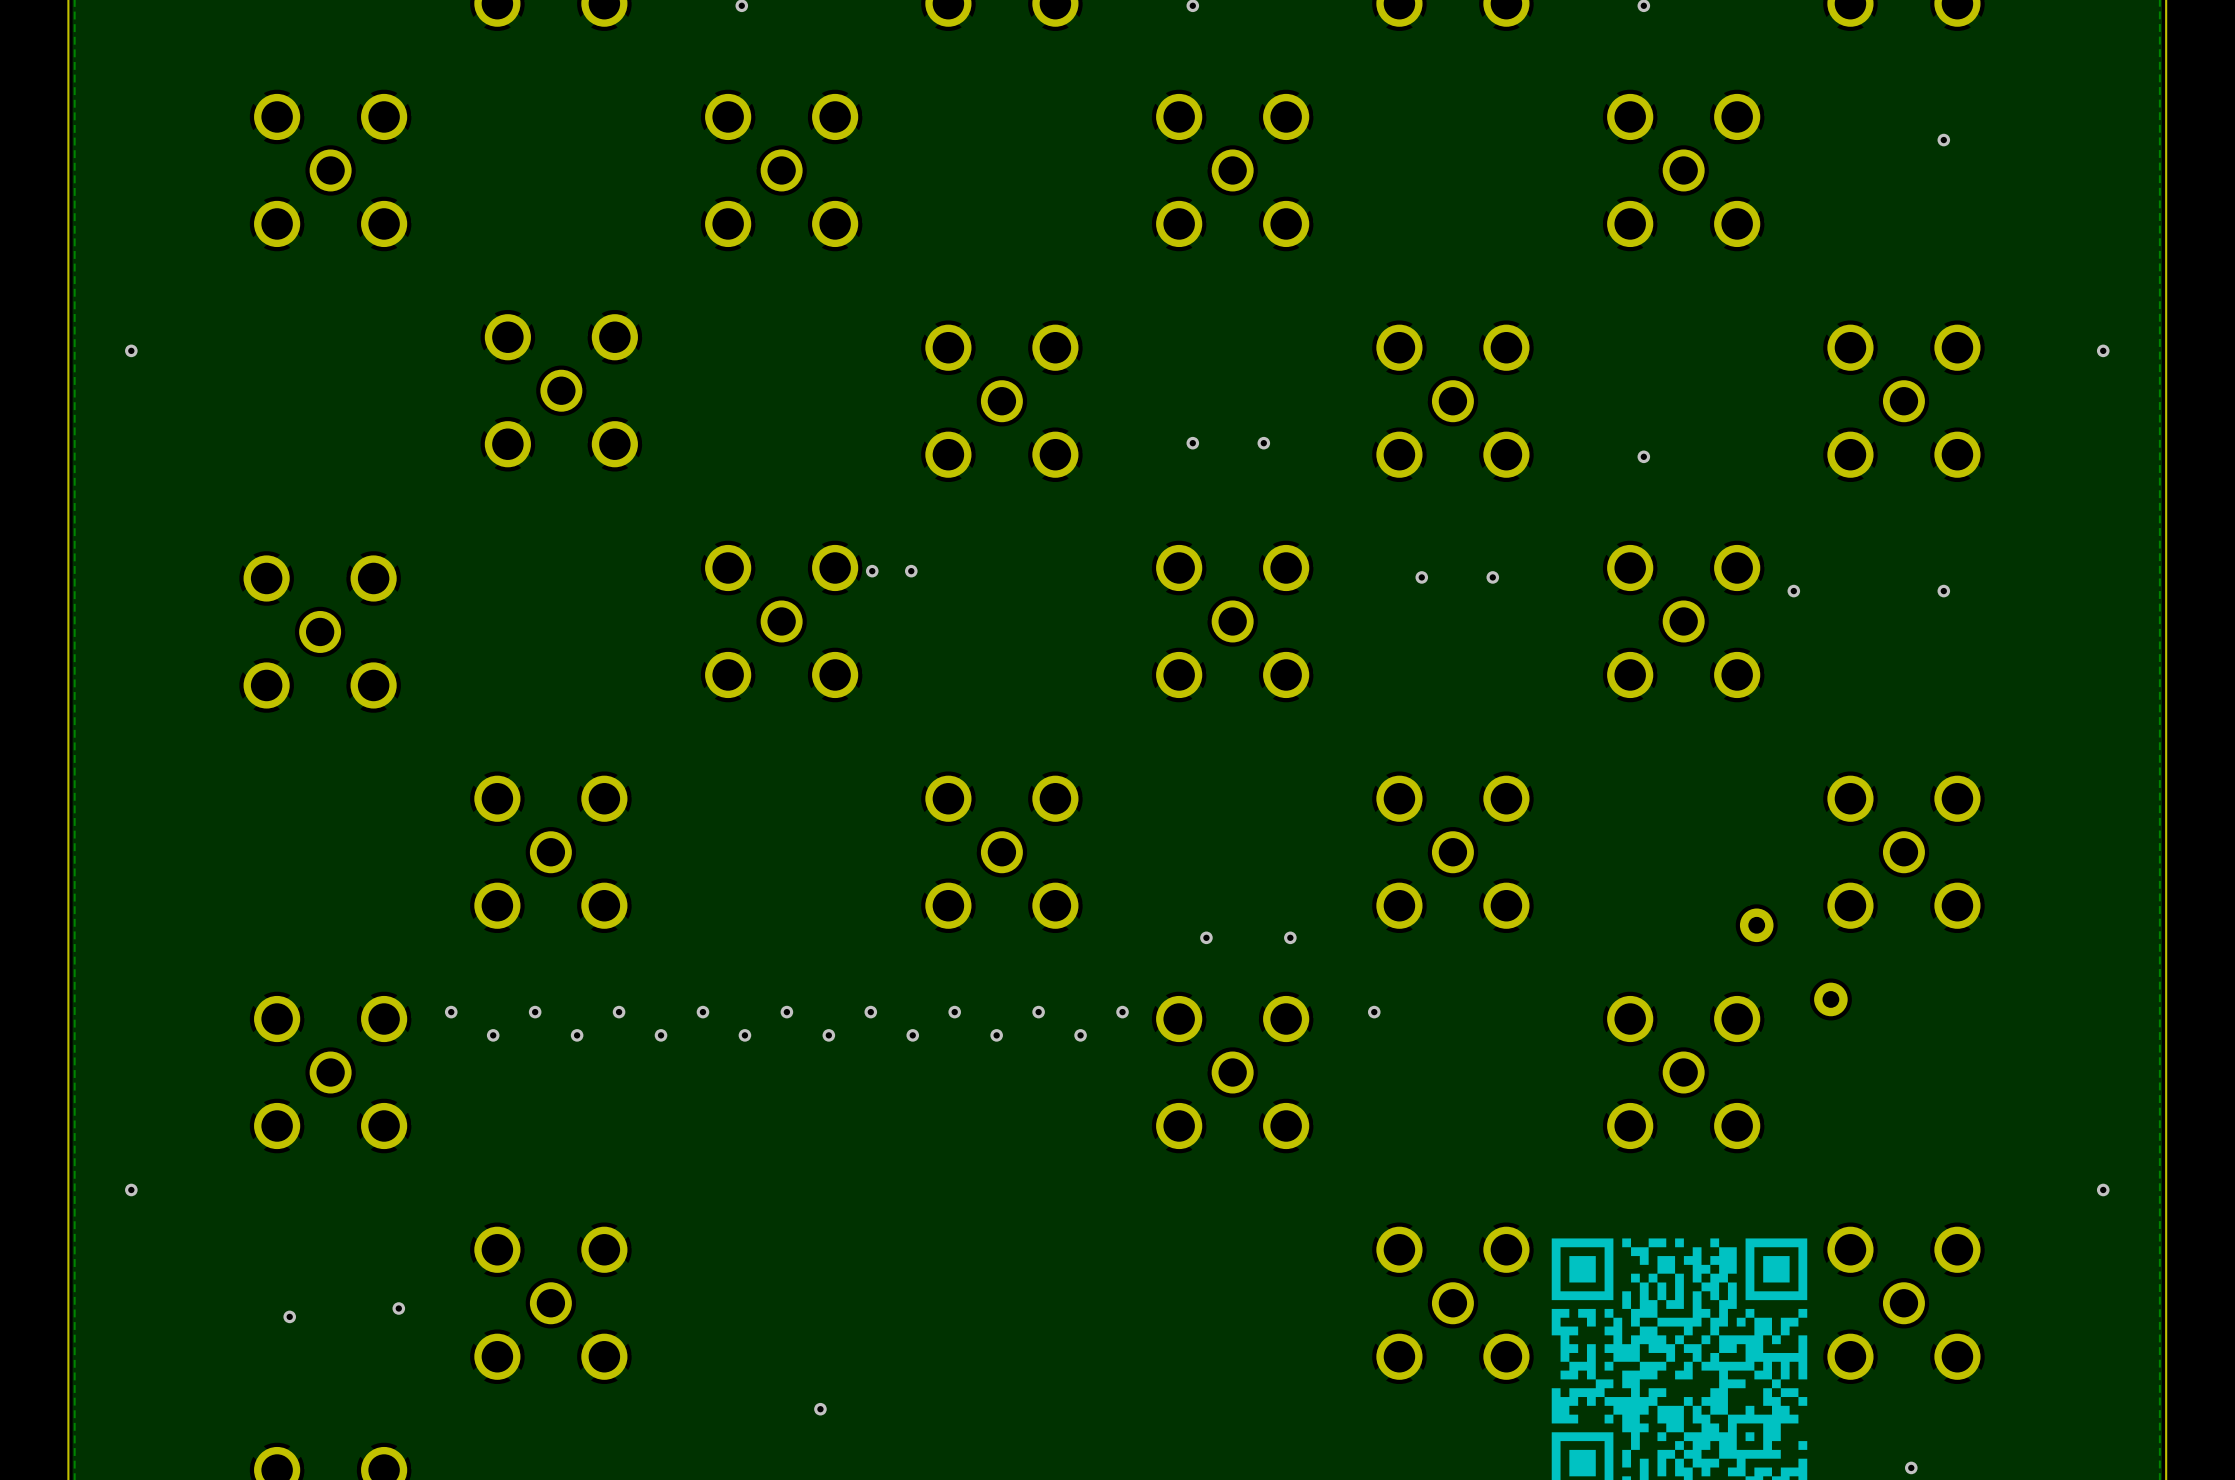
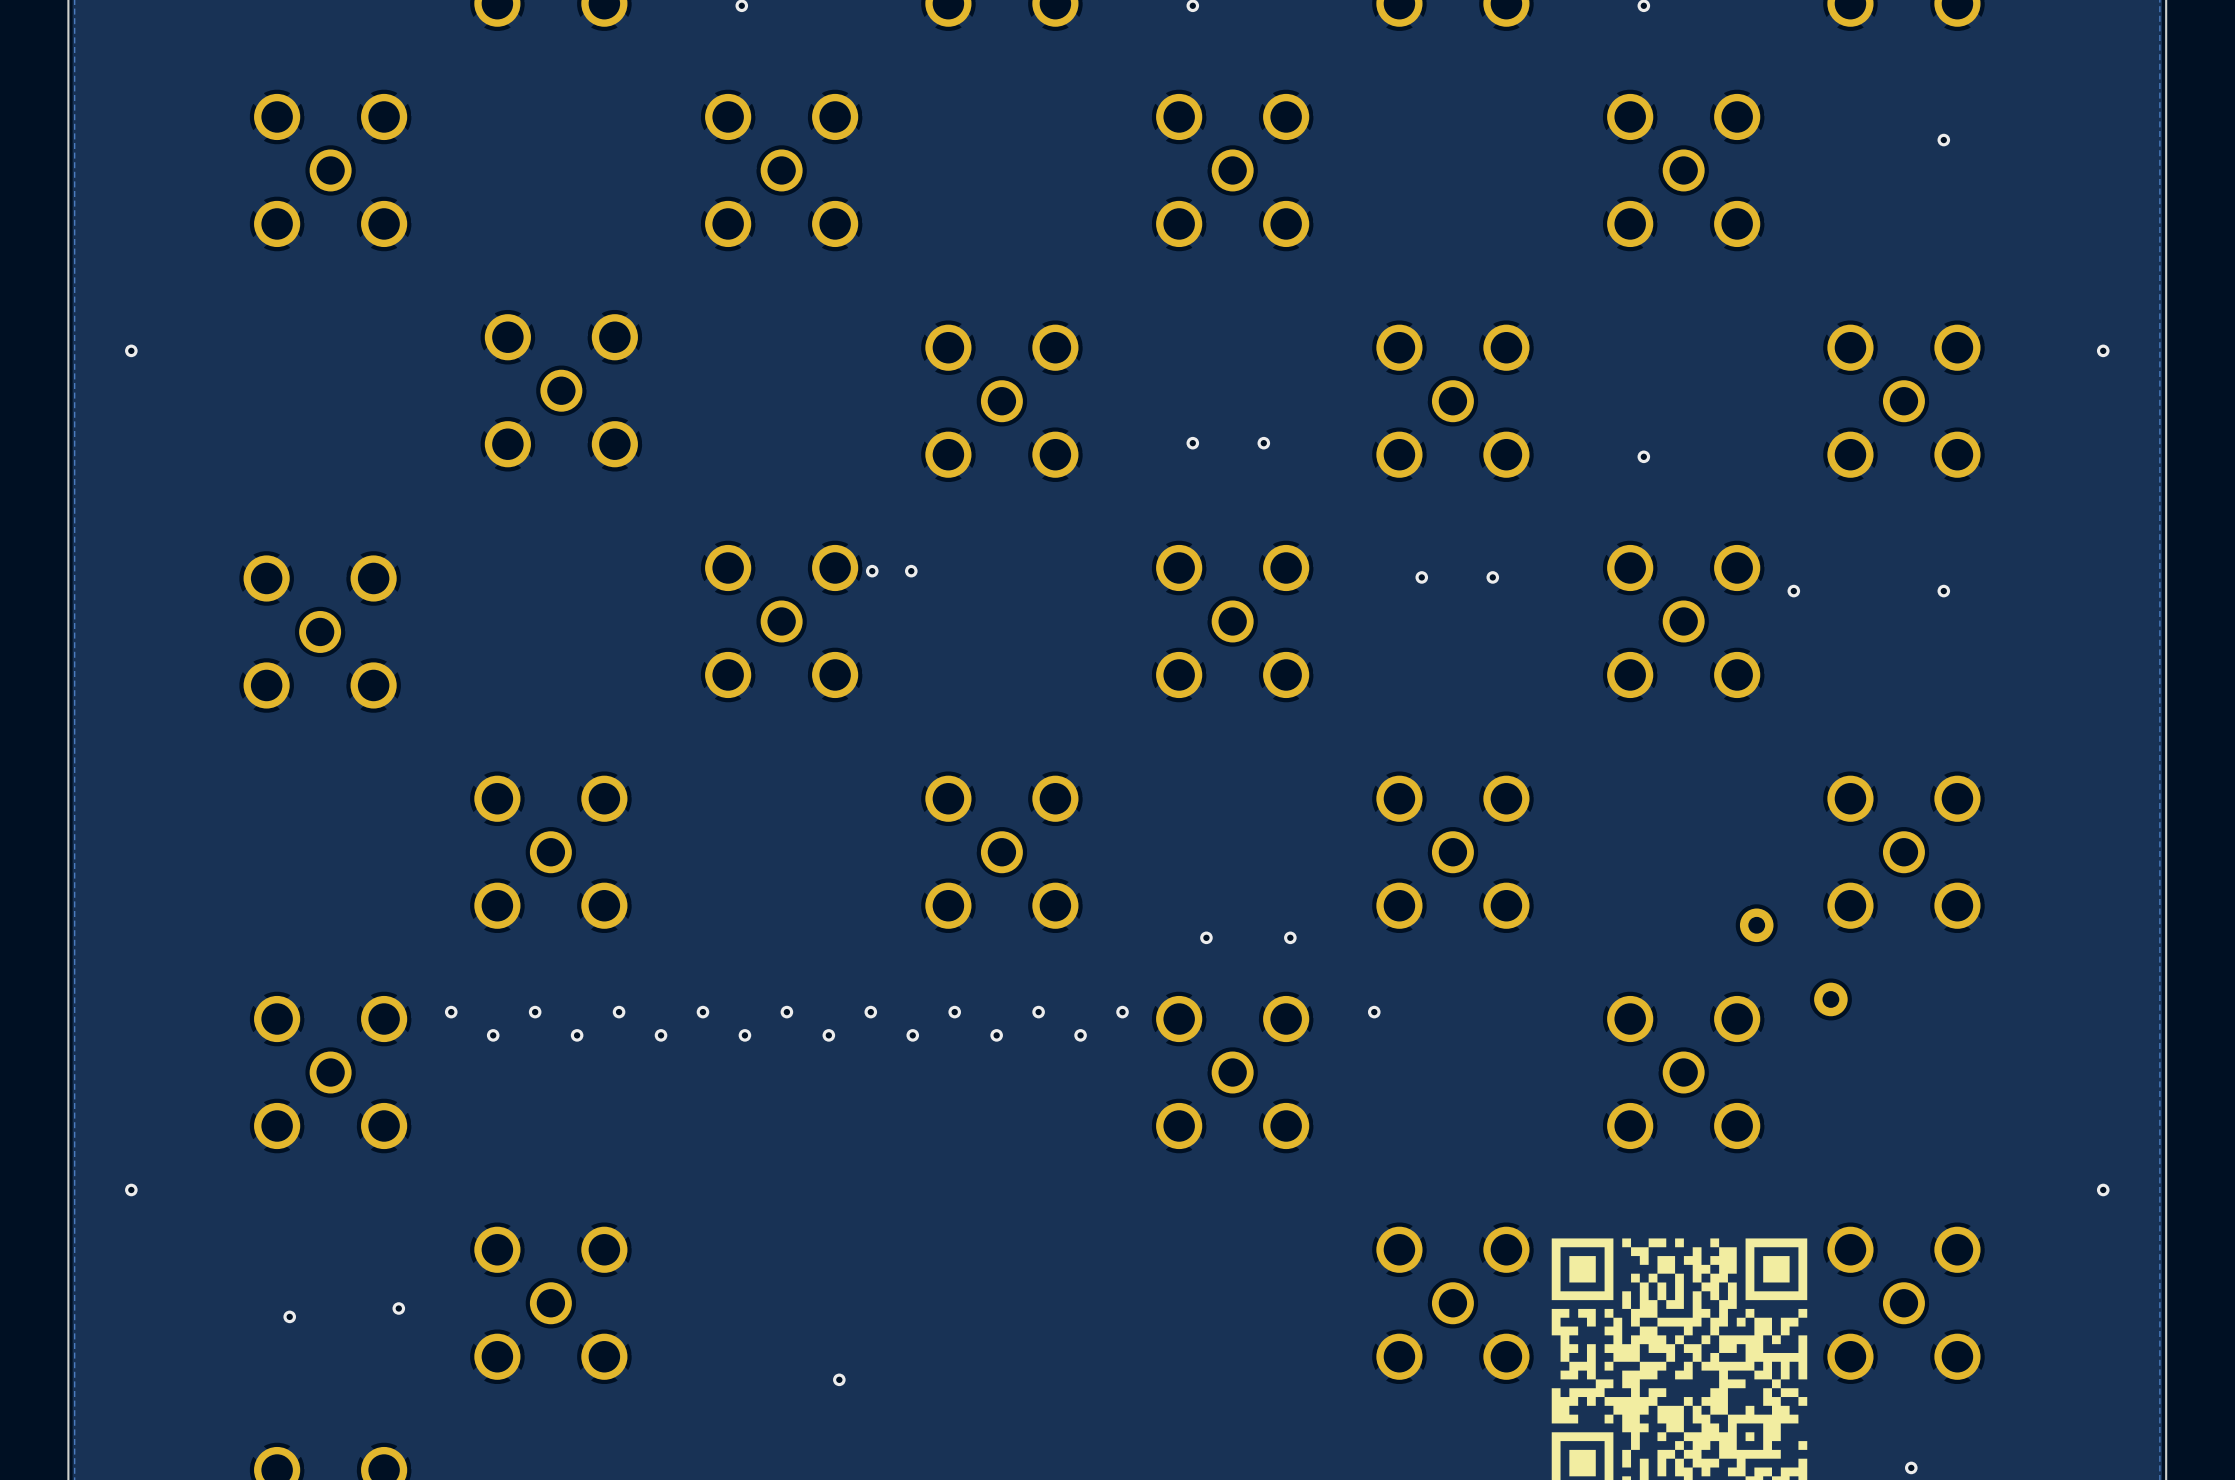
via position: (820, 1409) -> (839, 1379)

